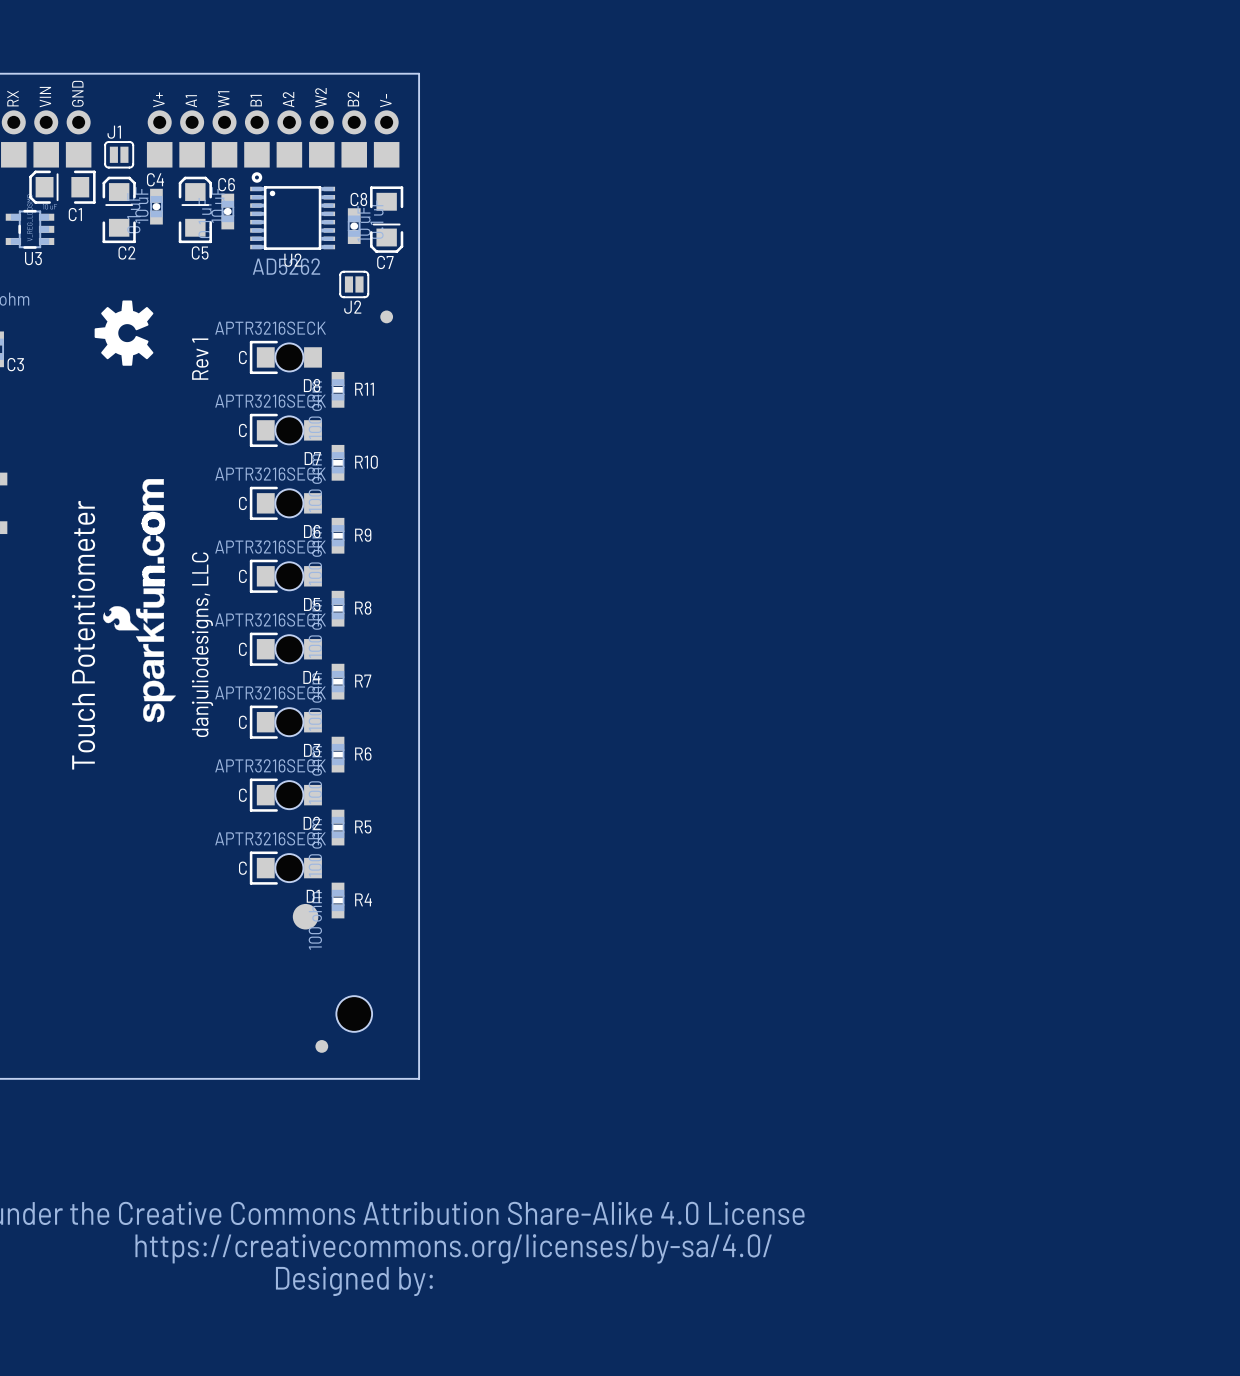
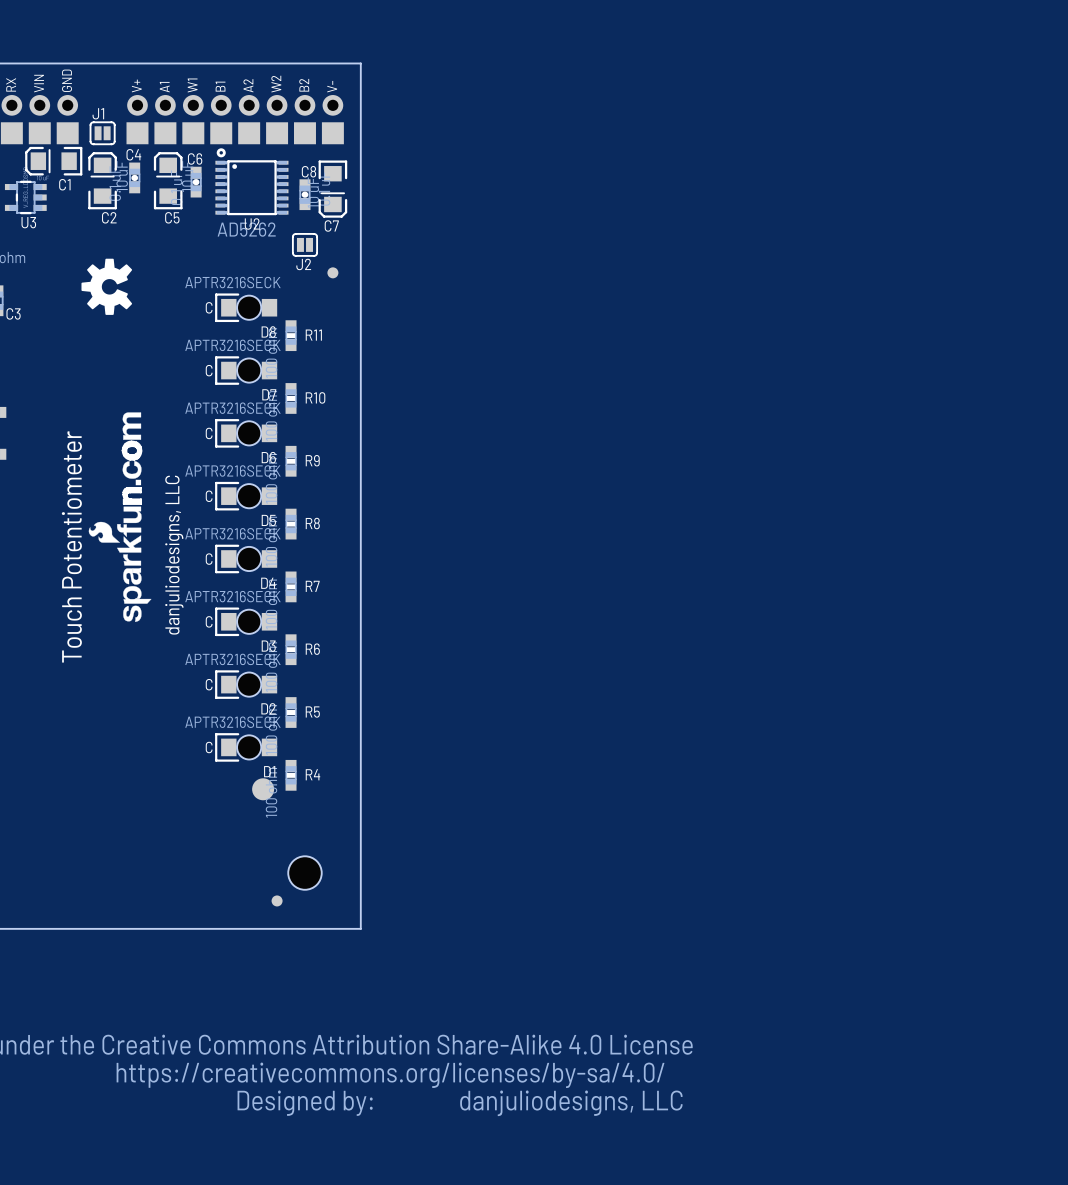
text: Rev 1 (200, 359) -> none
hole: (354, 1014) -> none
part: none -> (304, 873)
text: none -> danjuliodesigns, LLC (571, 1103)

